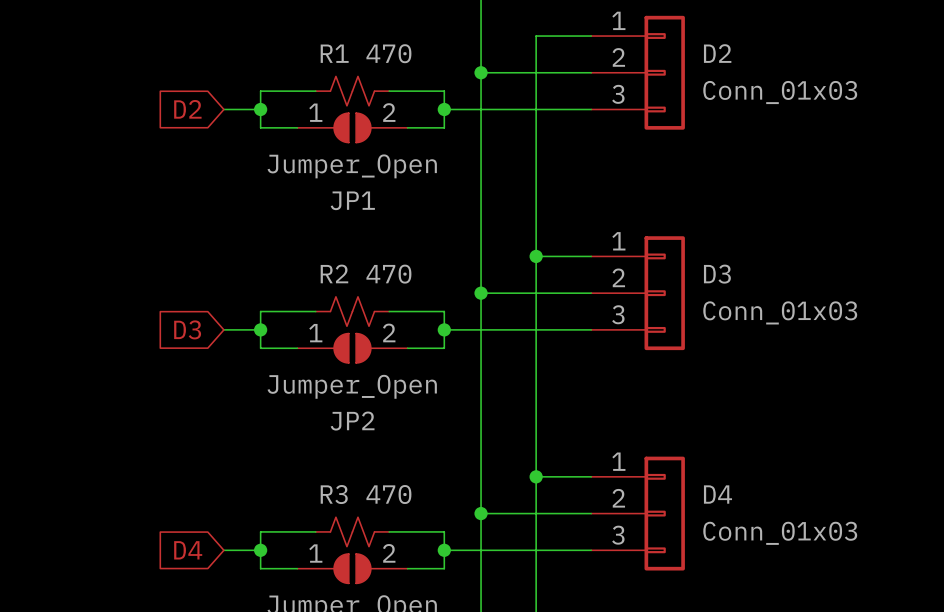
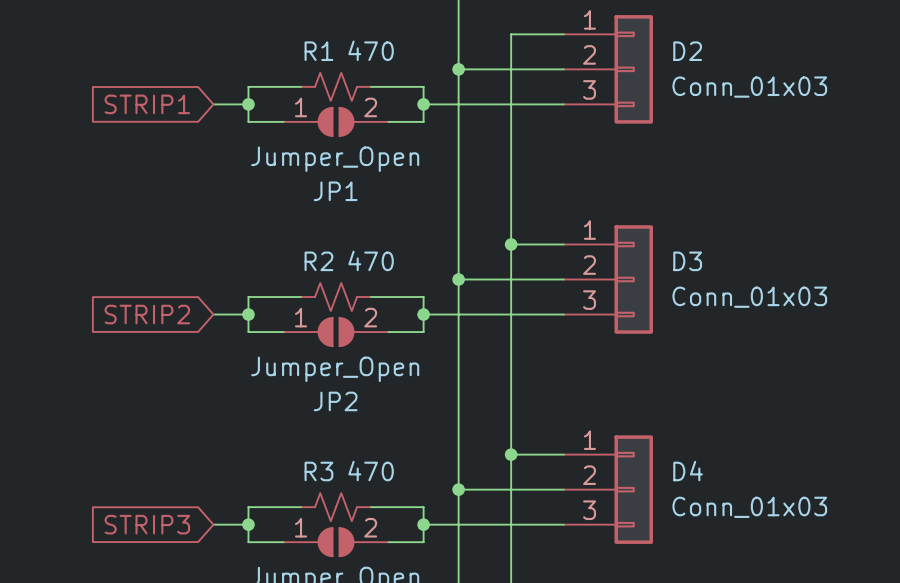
global label: D2 (187, 109) -> STRIP1 (147, 104)
global label: D3 (187, 329) -> STRIP2 (147, 314)
global label: D4 (188, 550) -> STRIP3 (147, 524)

